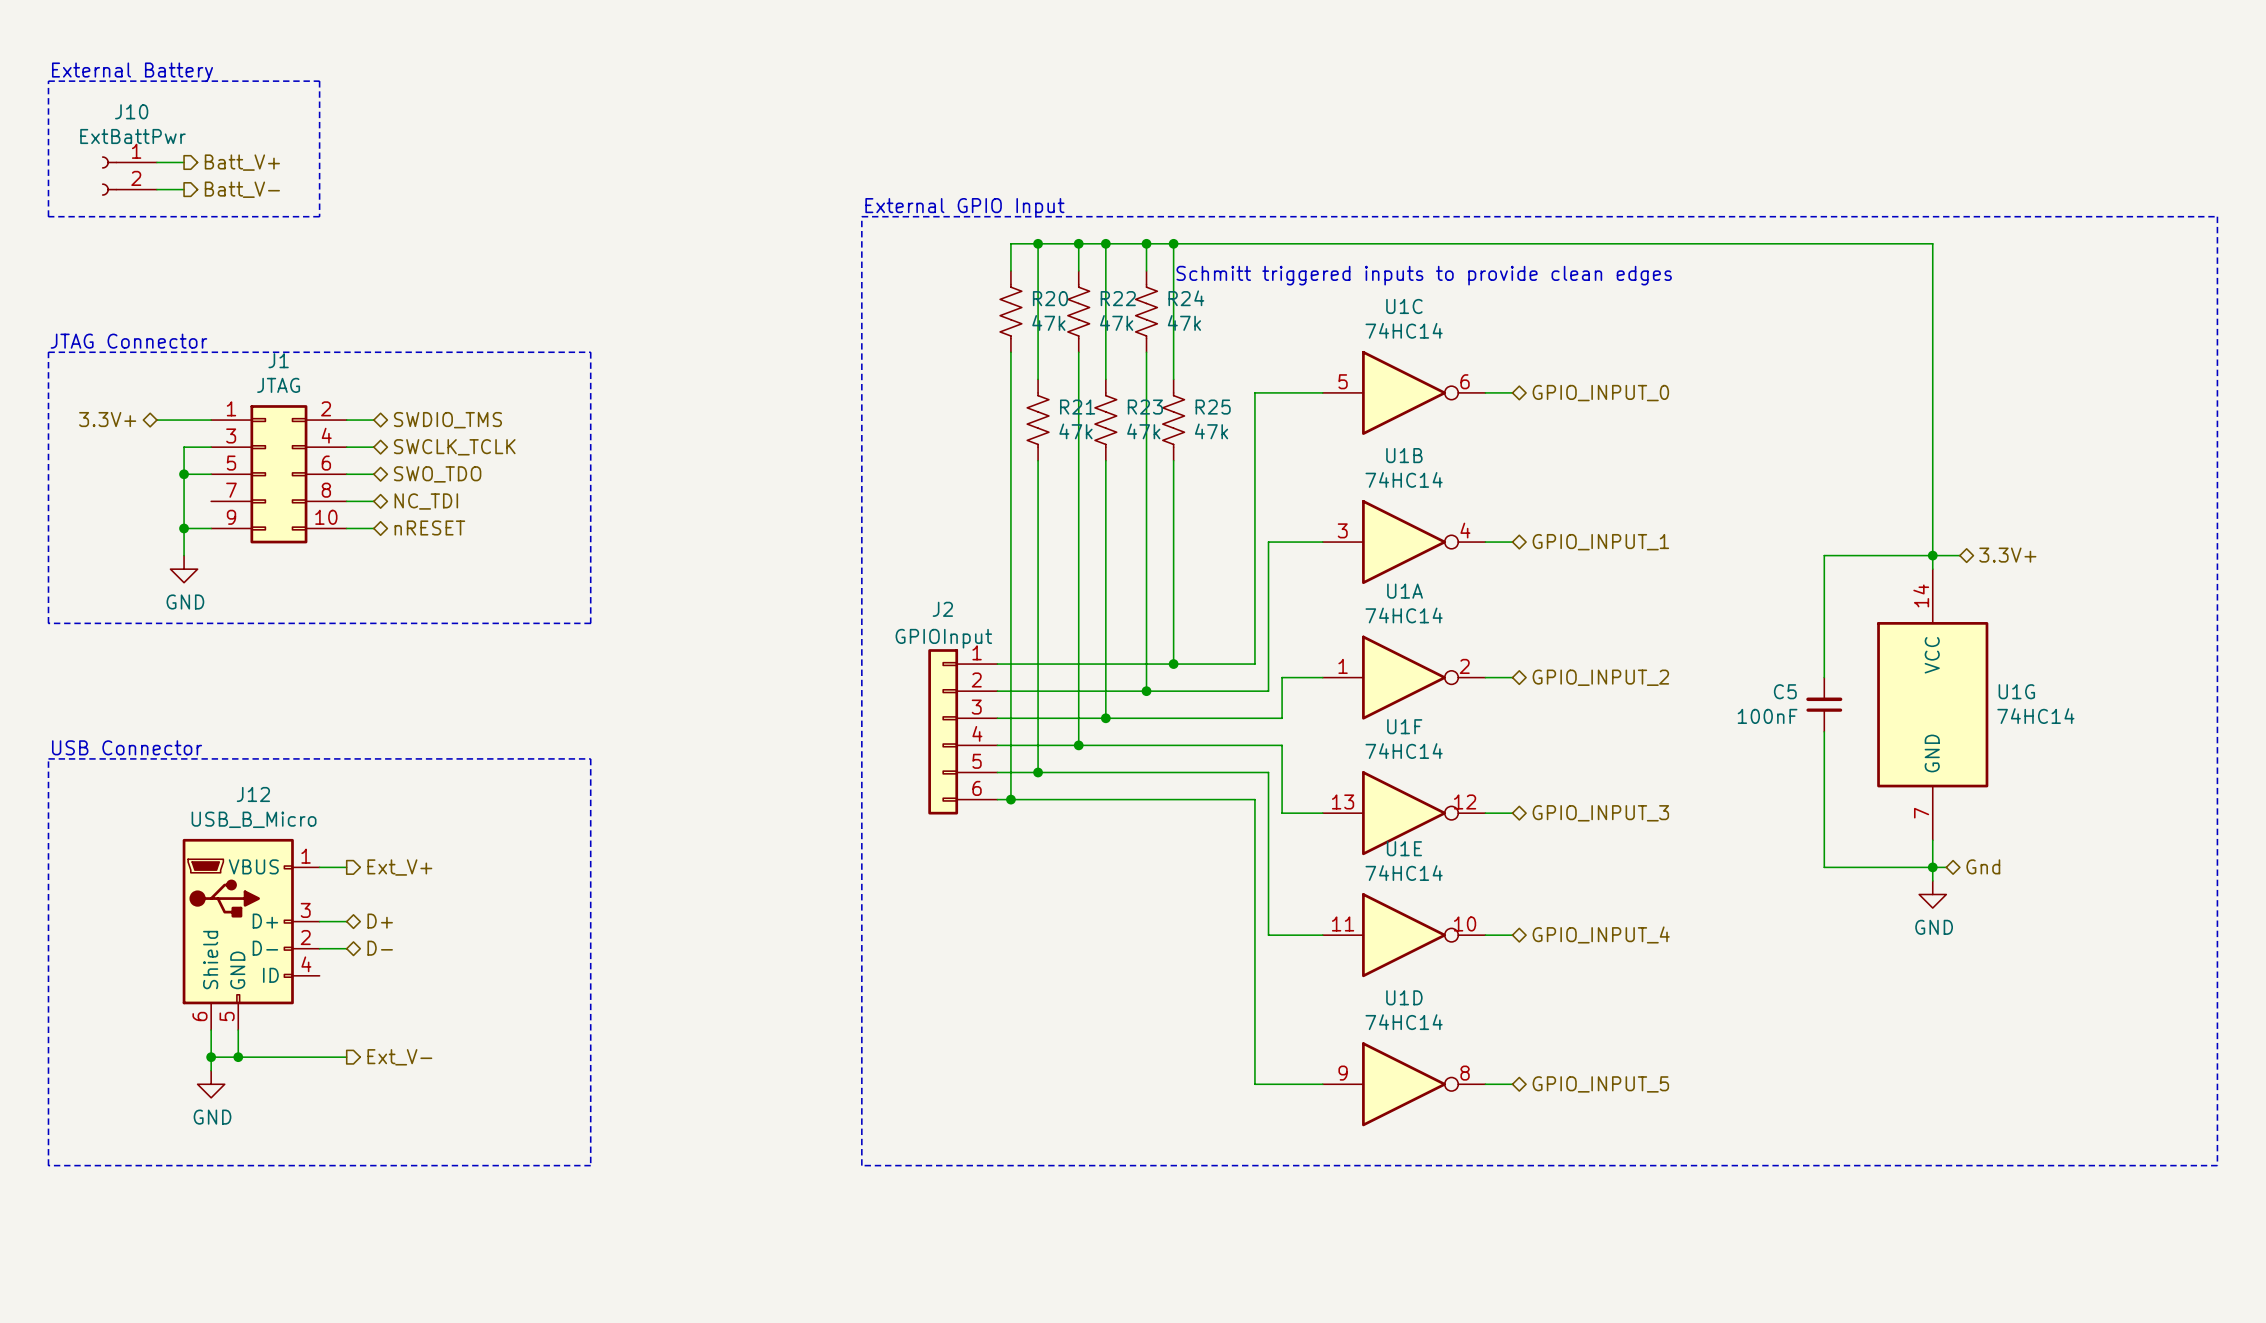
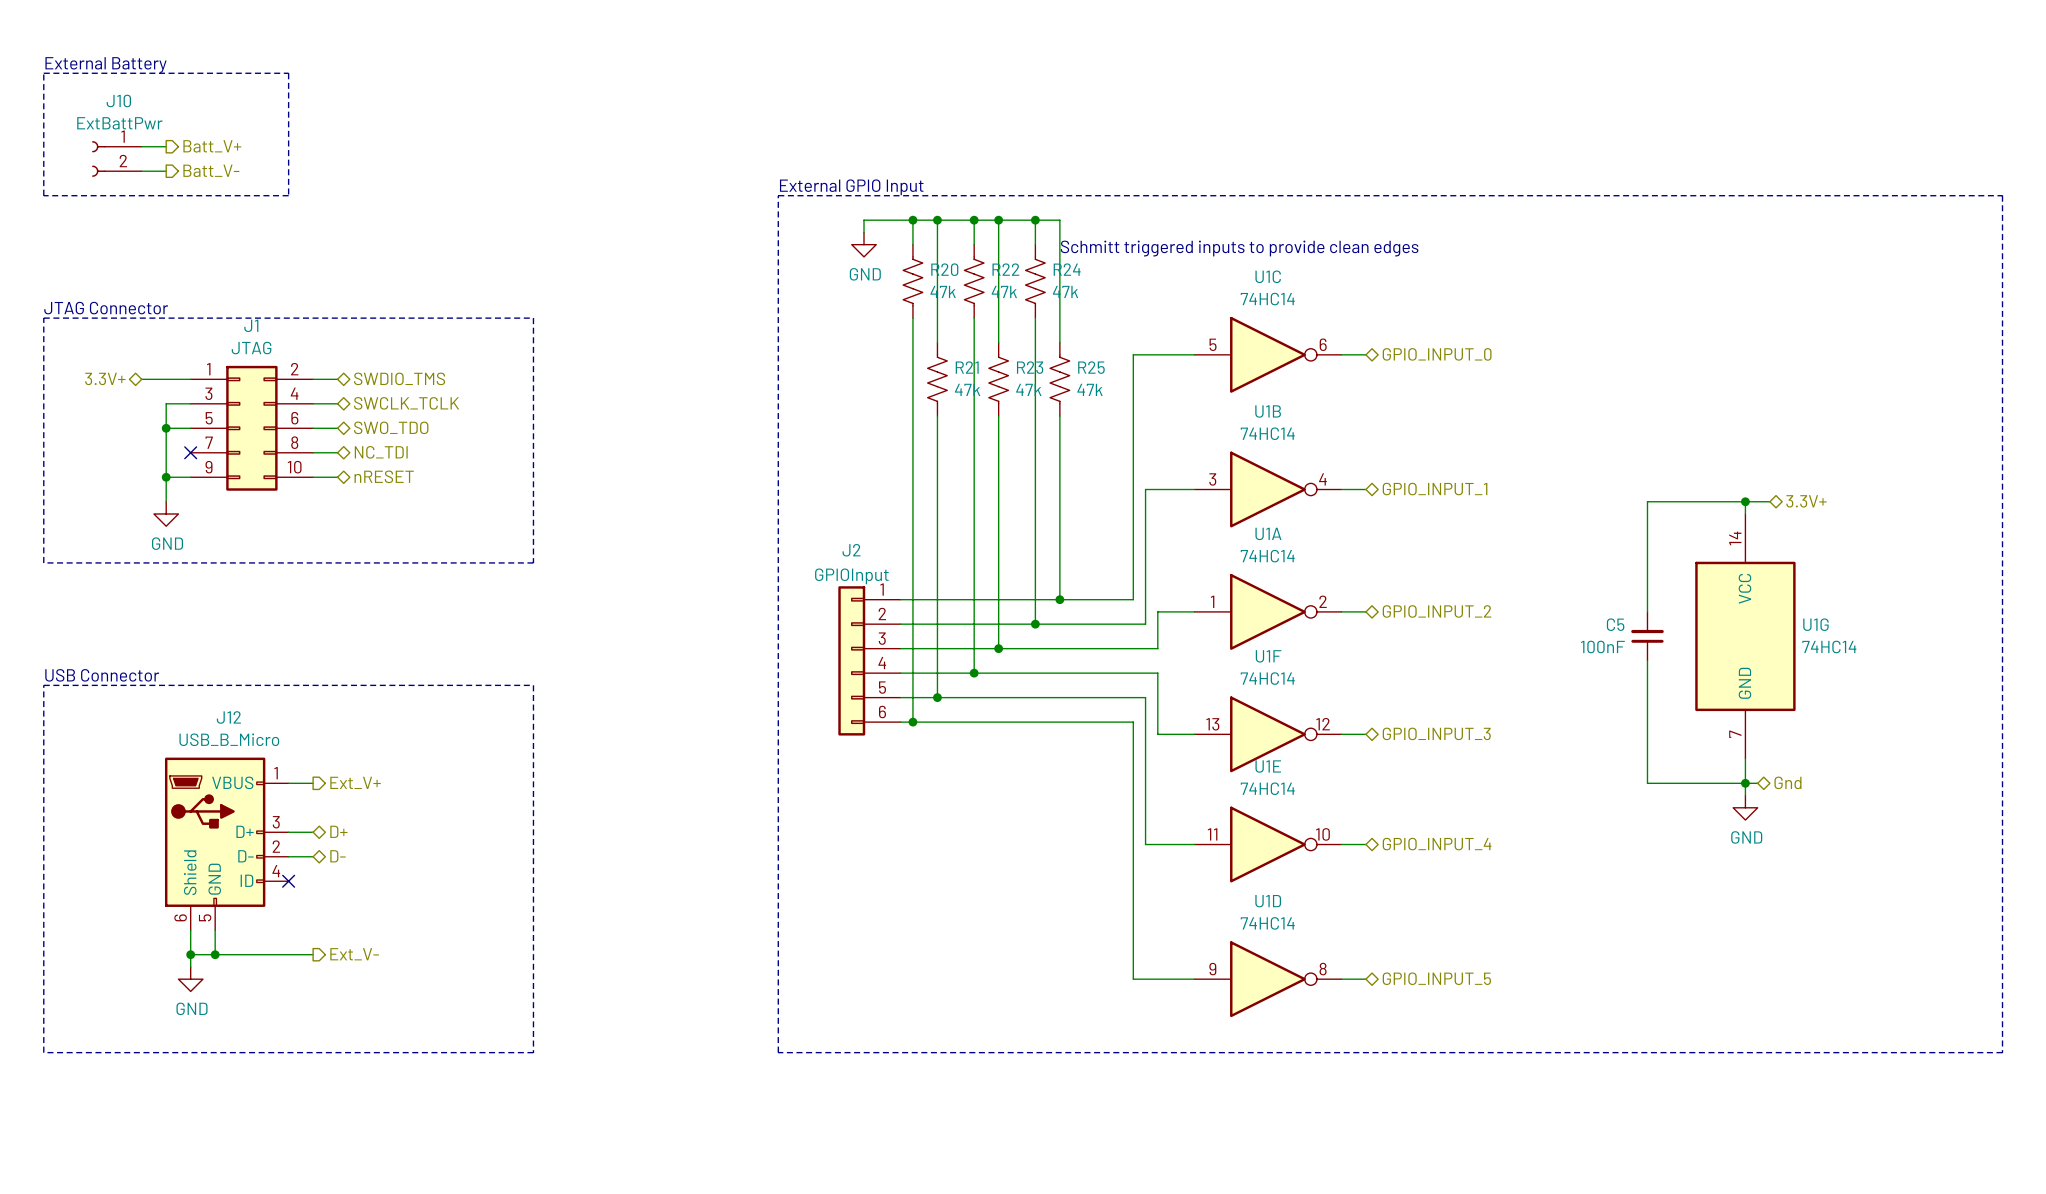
wire: none -> (912, 220) (864, 220) (864, 232)
junction: none -> (912, 220)
wire: (1173, 243) (1932, 243) (1932, 555) -> none
junction: (1173, 243) -> none
power symbol: none -> GND (864, 244)
no-connect mark: none -> (190, 452)
no-connect mark: none -> (288, 881)

